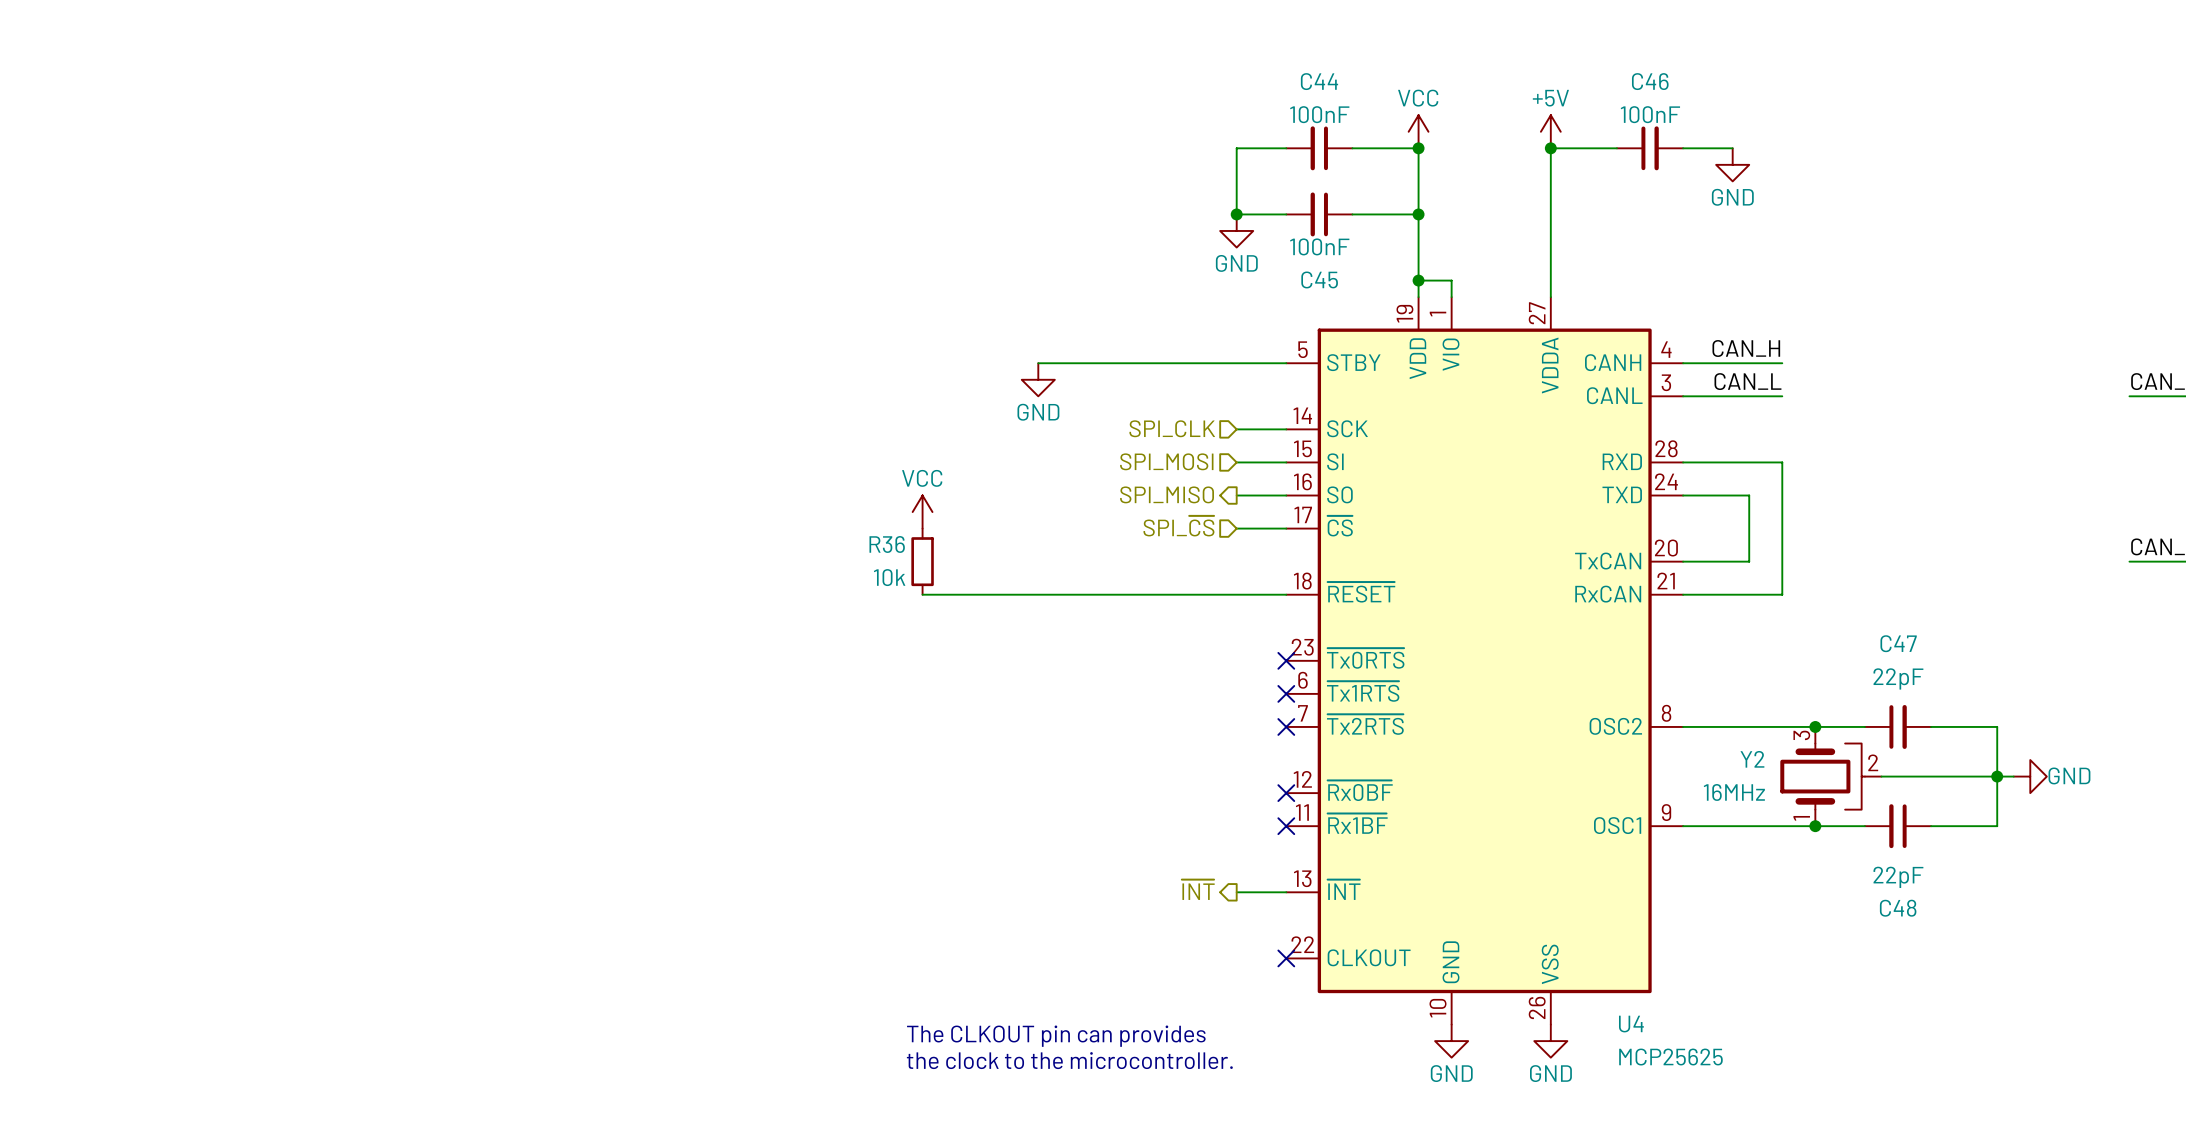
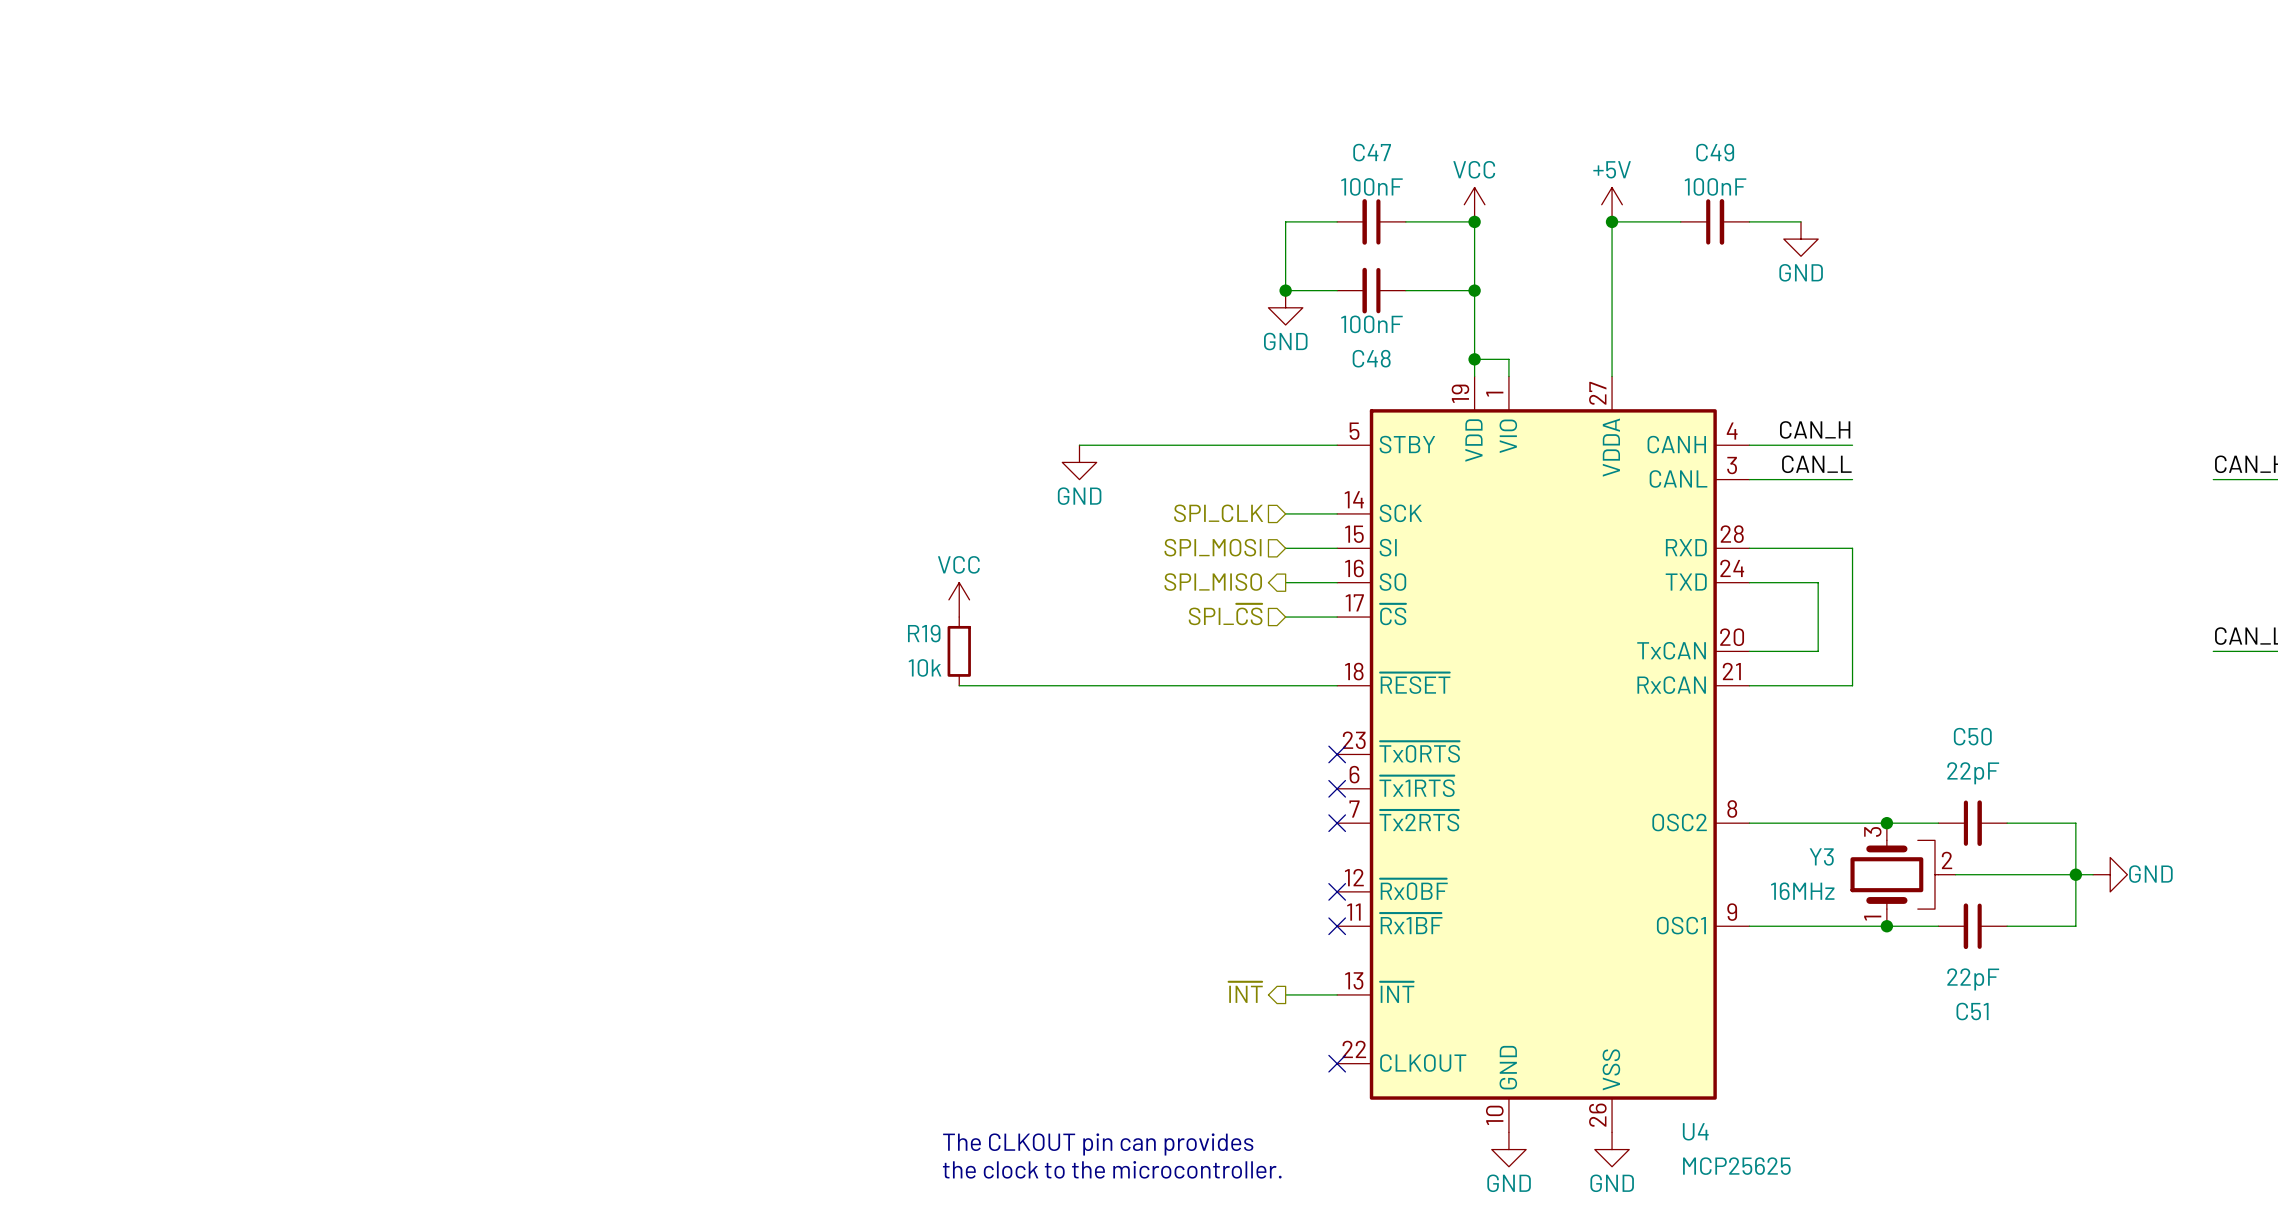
C44 name: C44 (1319, 81) -> C47 (1372, 152)
C46 name: C46 (1650, 81) -> C49 (1715, 152)
C45 name: C45 (1319, 279) -> C48 (1371, 358)
R36 name: R36 (887, 544) -> R19 (924, 633)
C47 name: C47 (1898, 643) -> C50 (1972, 736)
Y2 name: Y2 (1752, 759) -> Y3 (1821, 856)
C48 name: C48 (1898, 908) -> C51 (1972, 1011)

